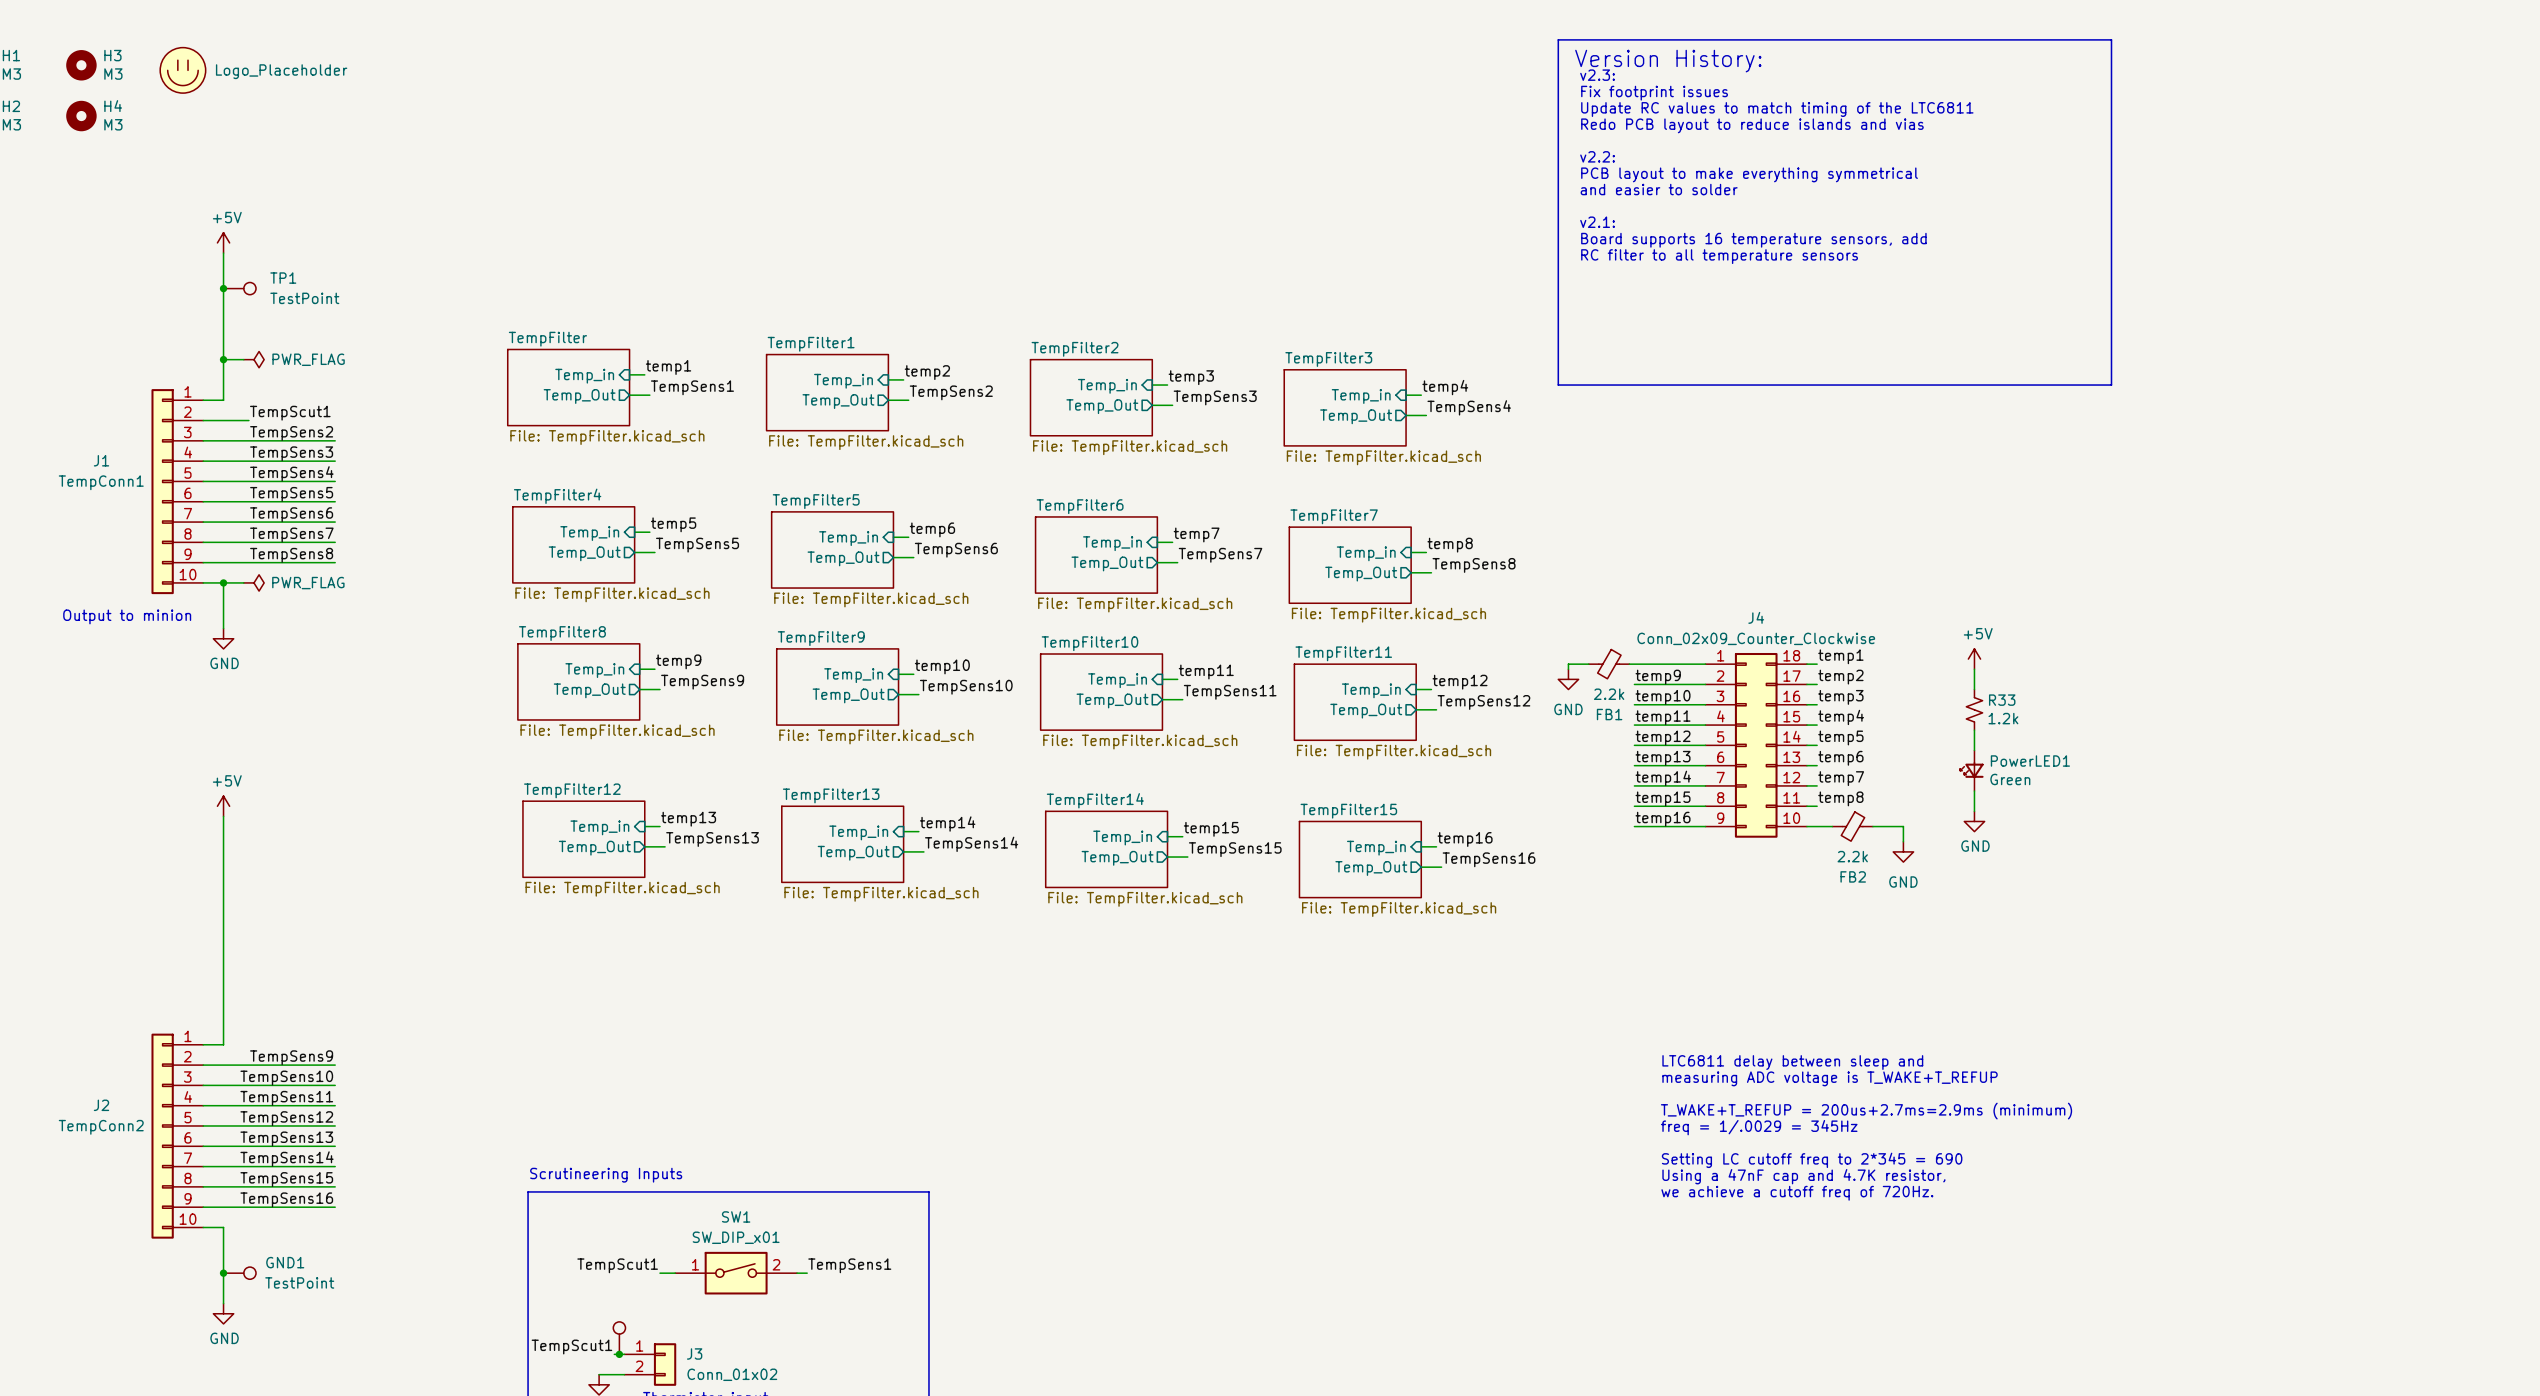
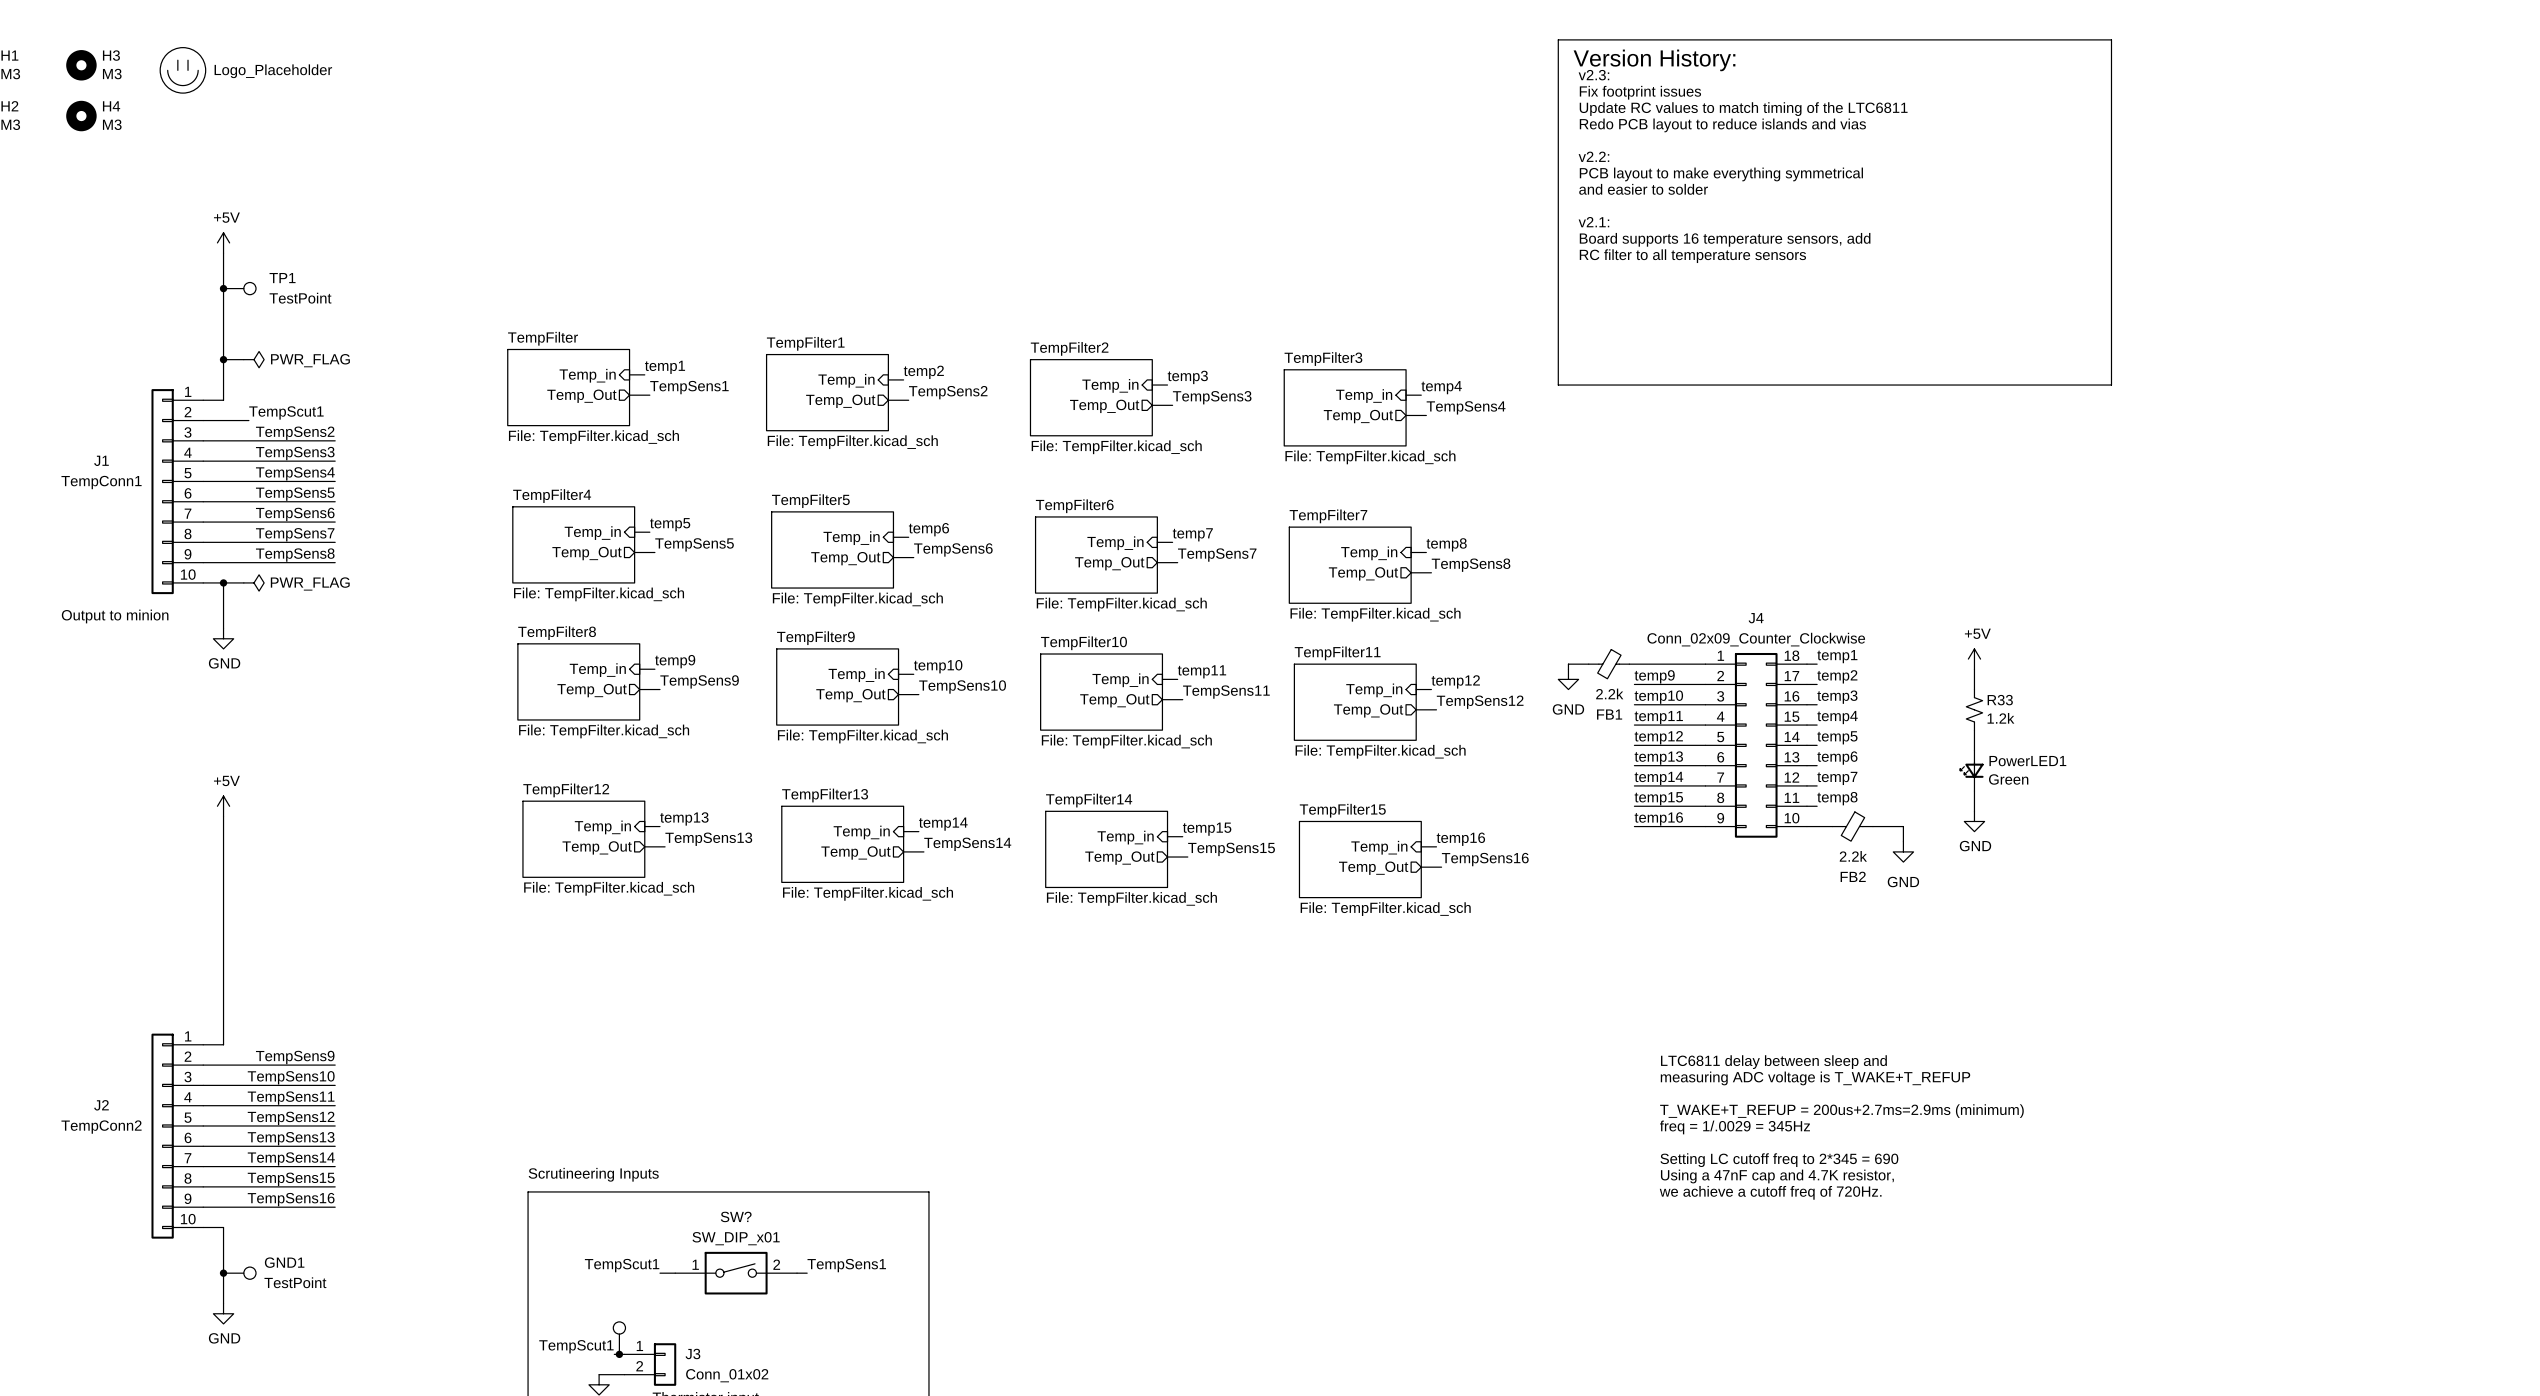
SW1 name: SW1 (736, 1216) -> SW? (736, 1216)

